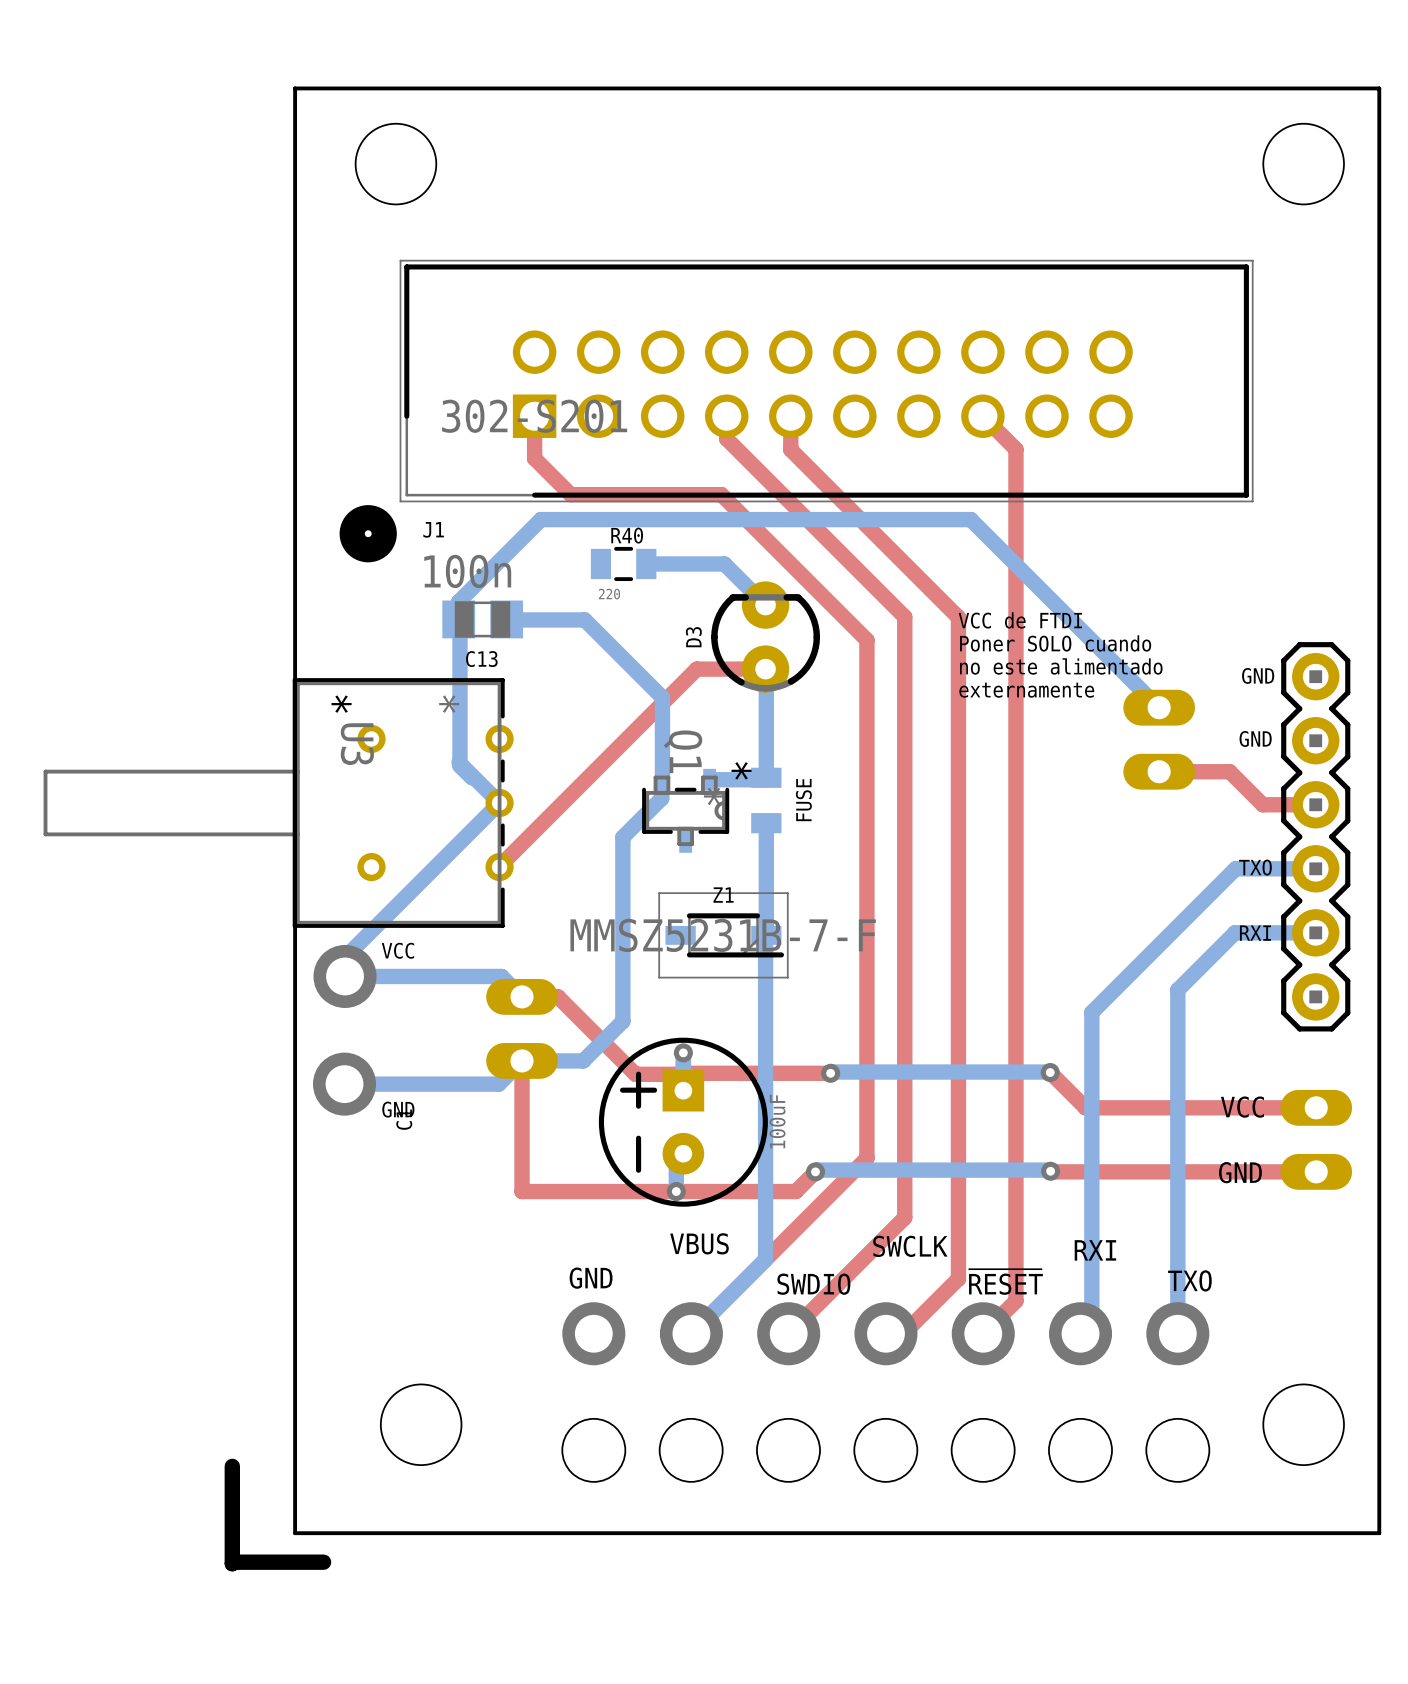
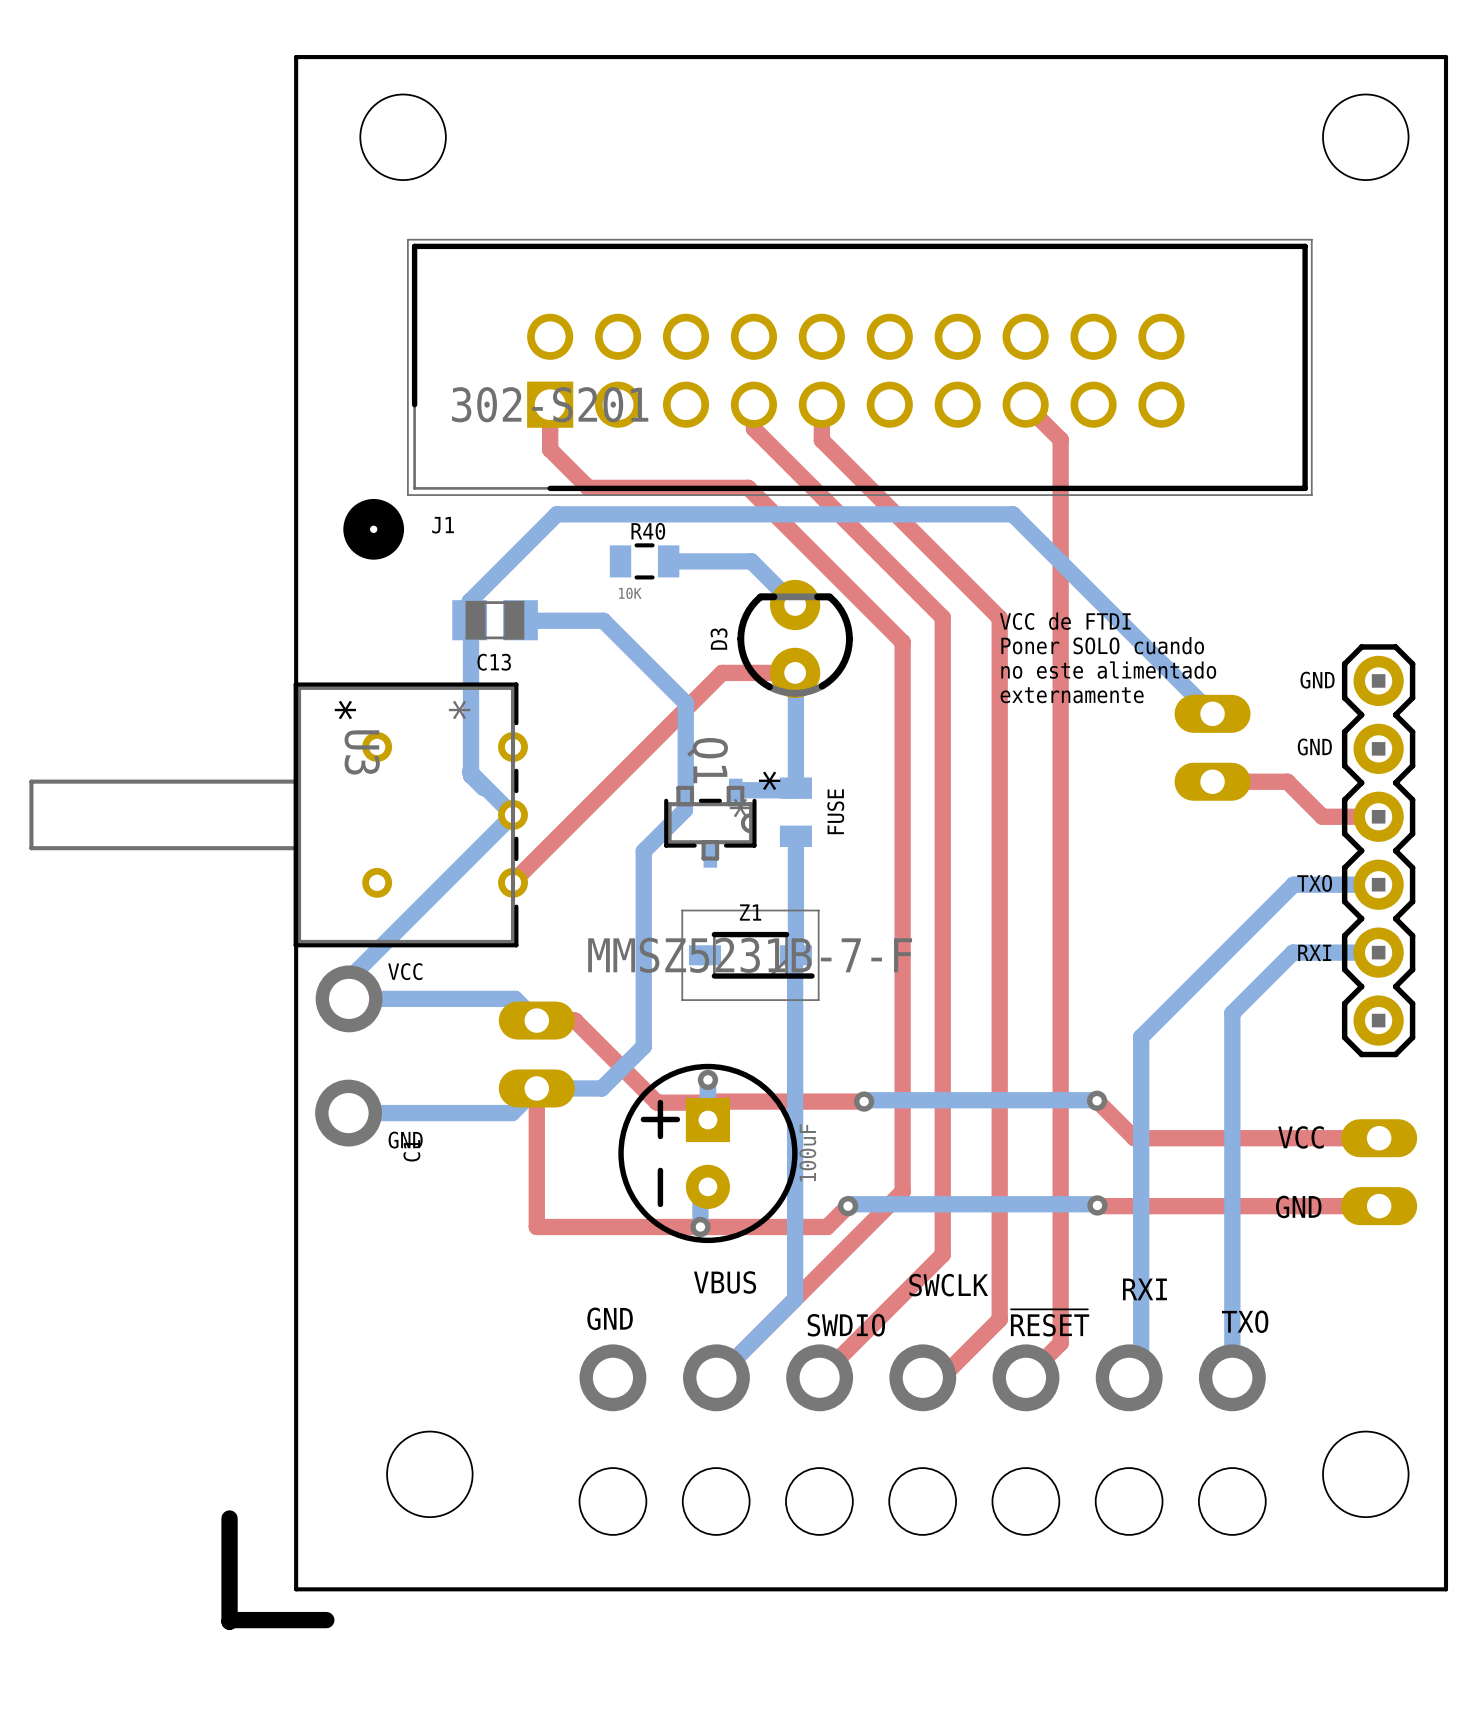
C13 value: 100n (467, 571) -> none
R40 value: 220 (609, 594) -> 10K (630, 593)

